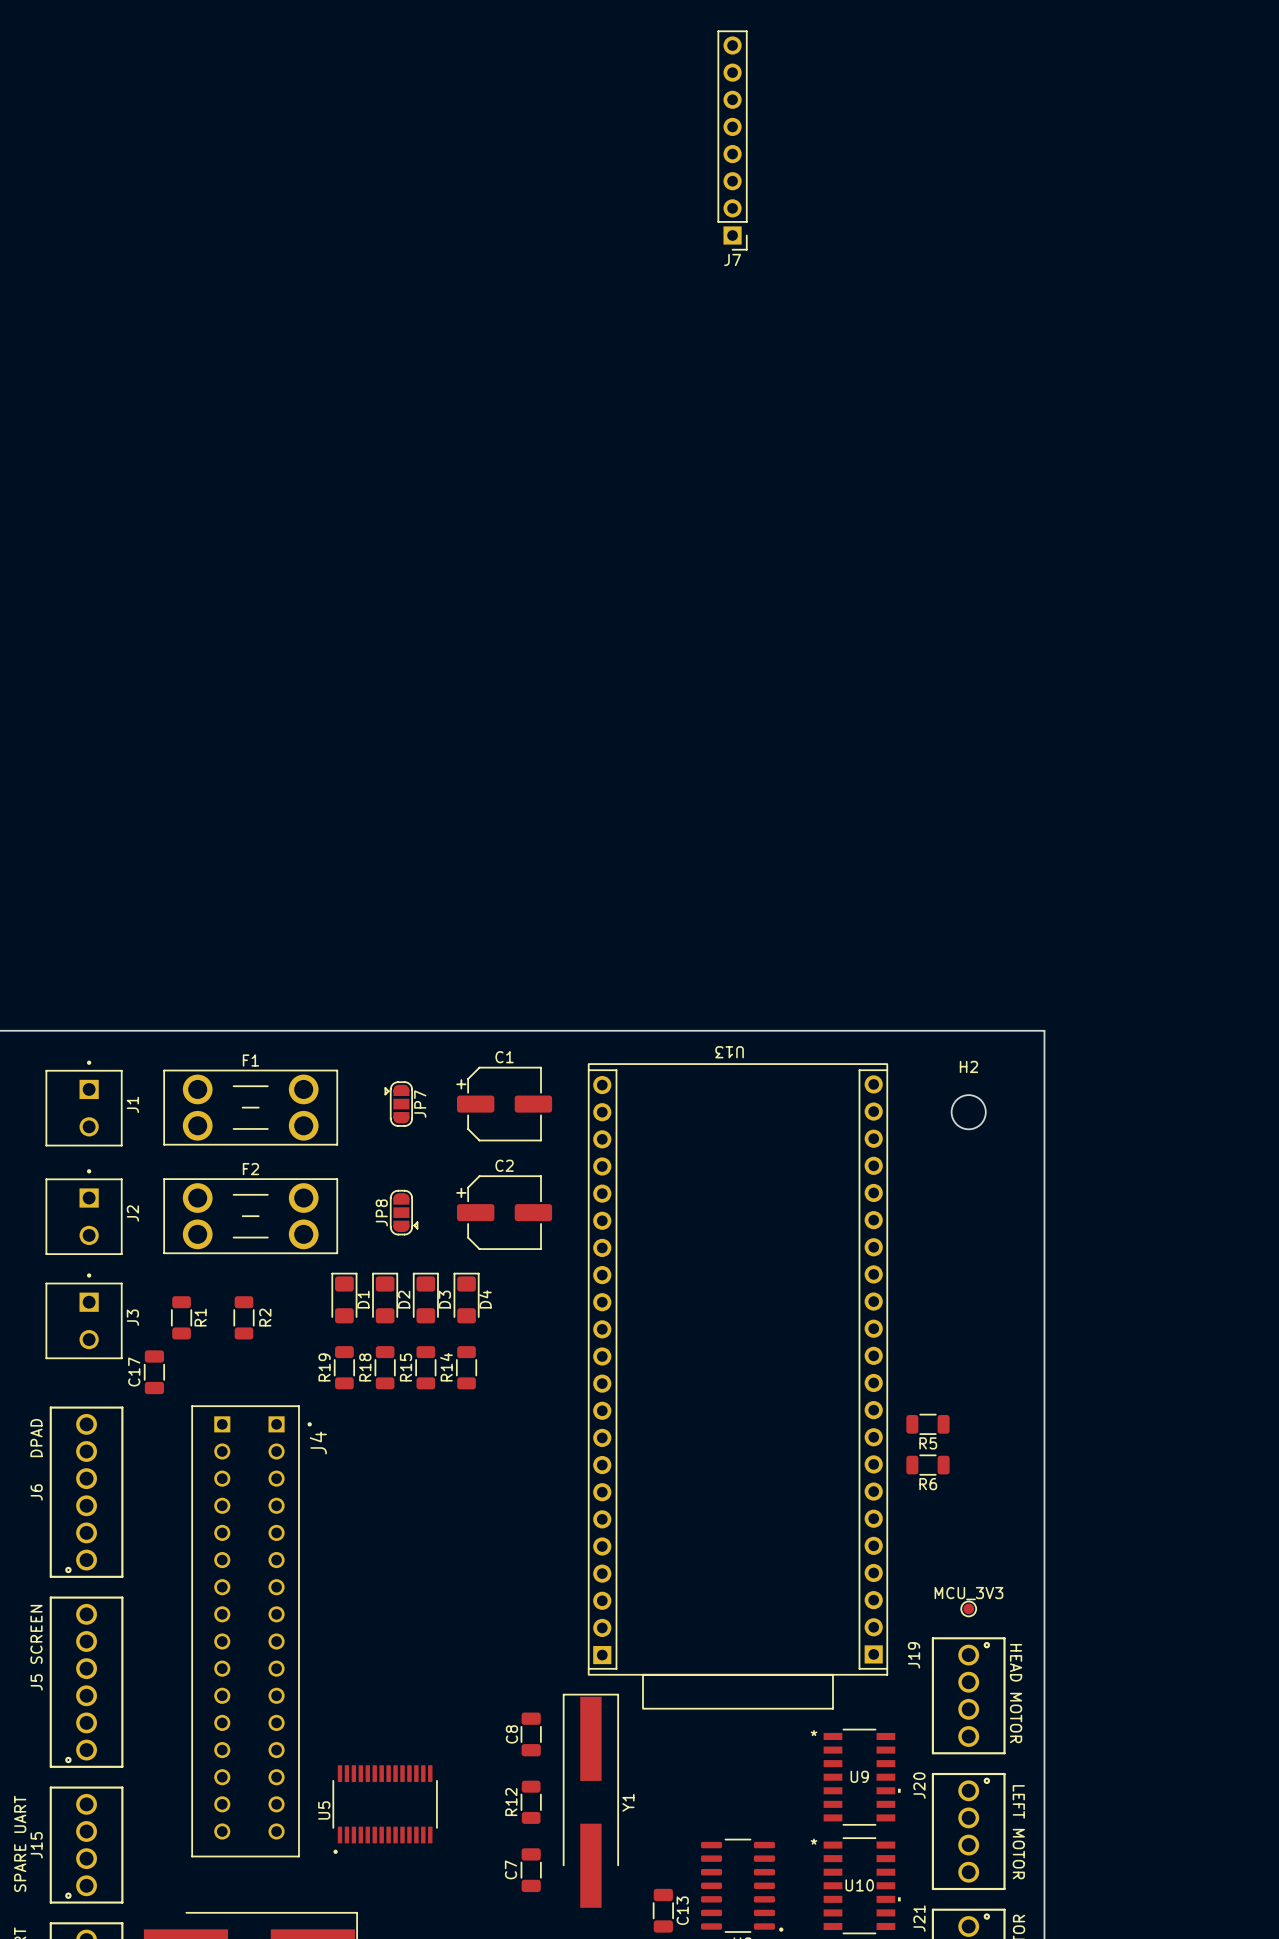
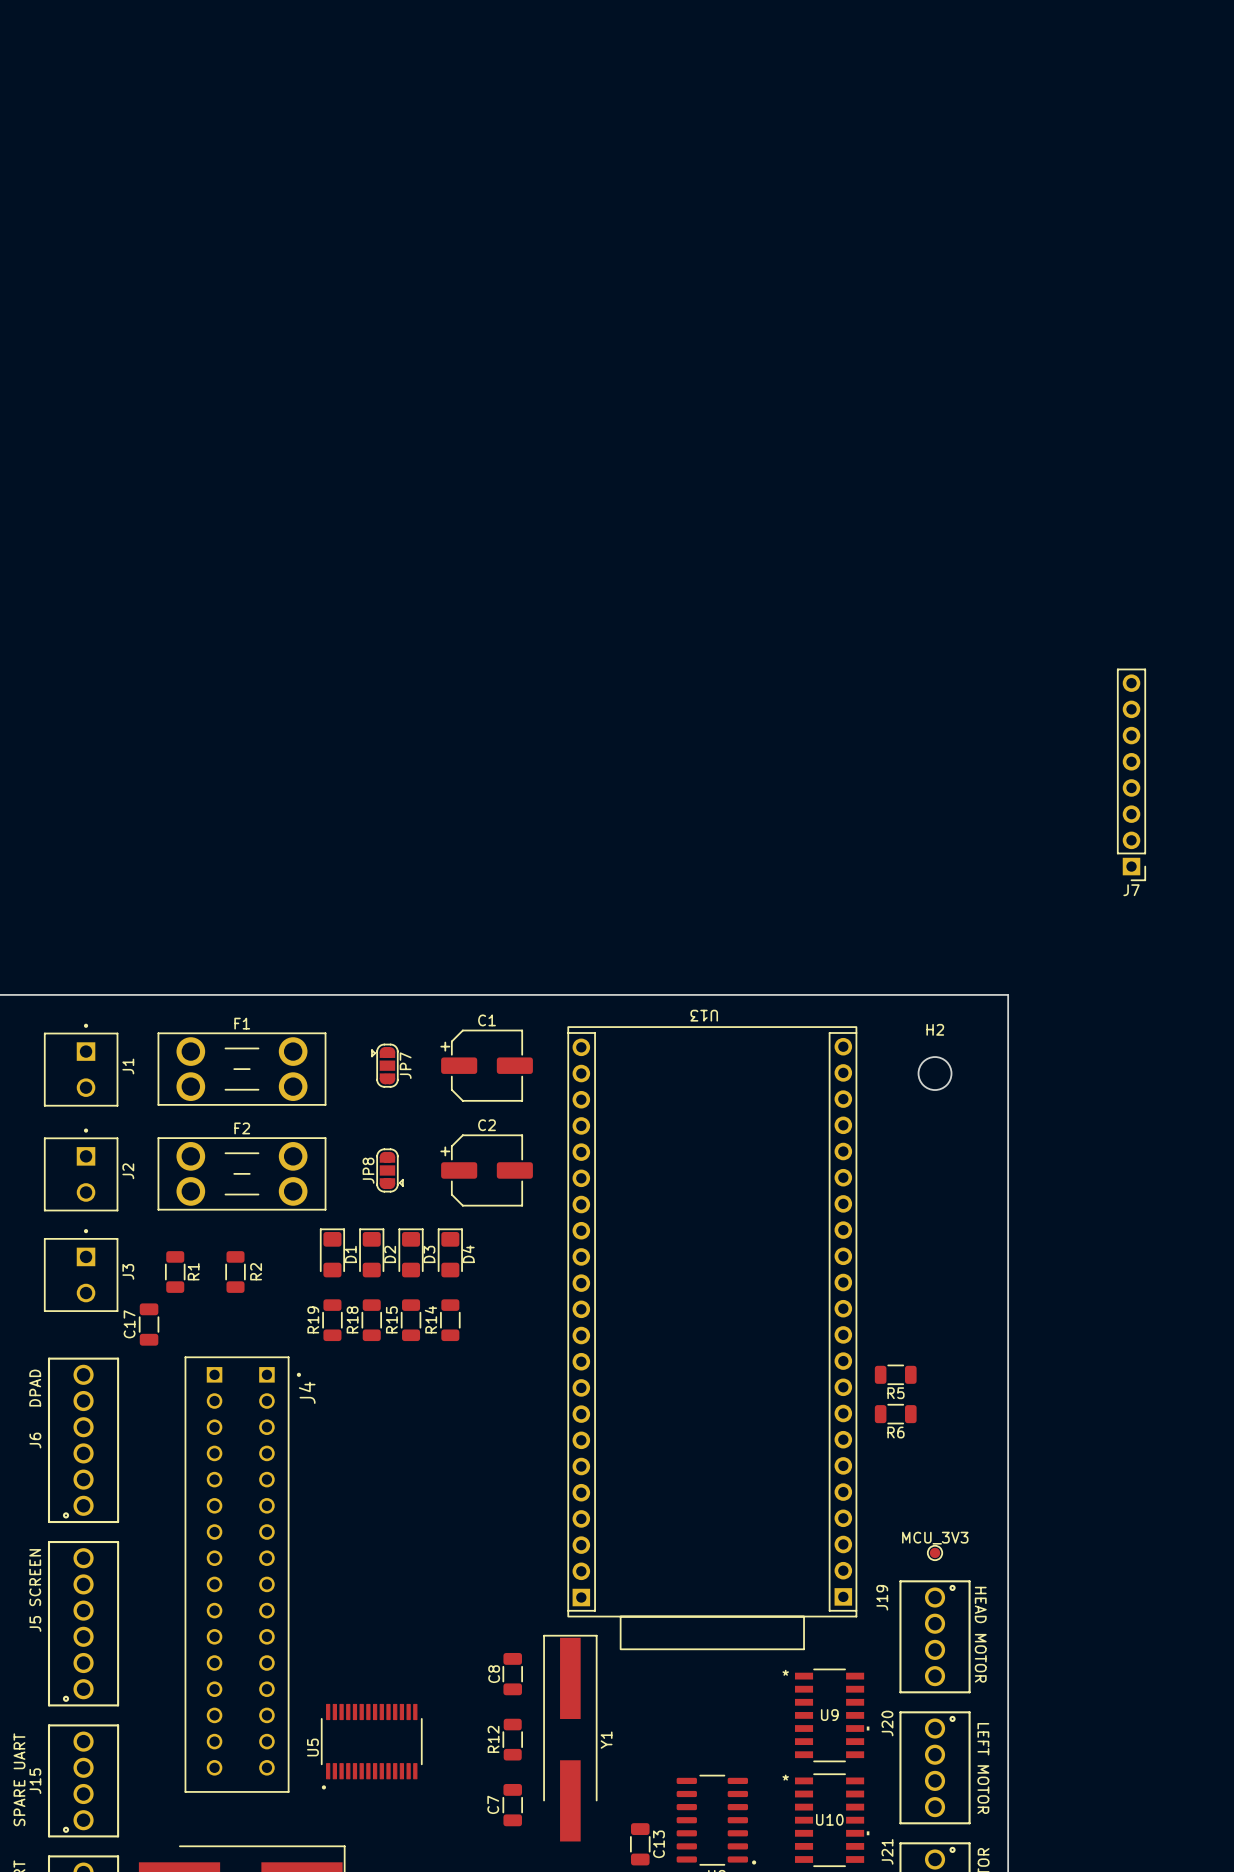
J7 position: (732, 140) -> (1131, 774)

